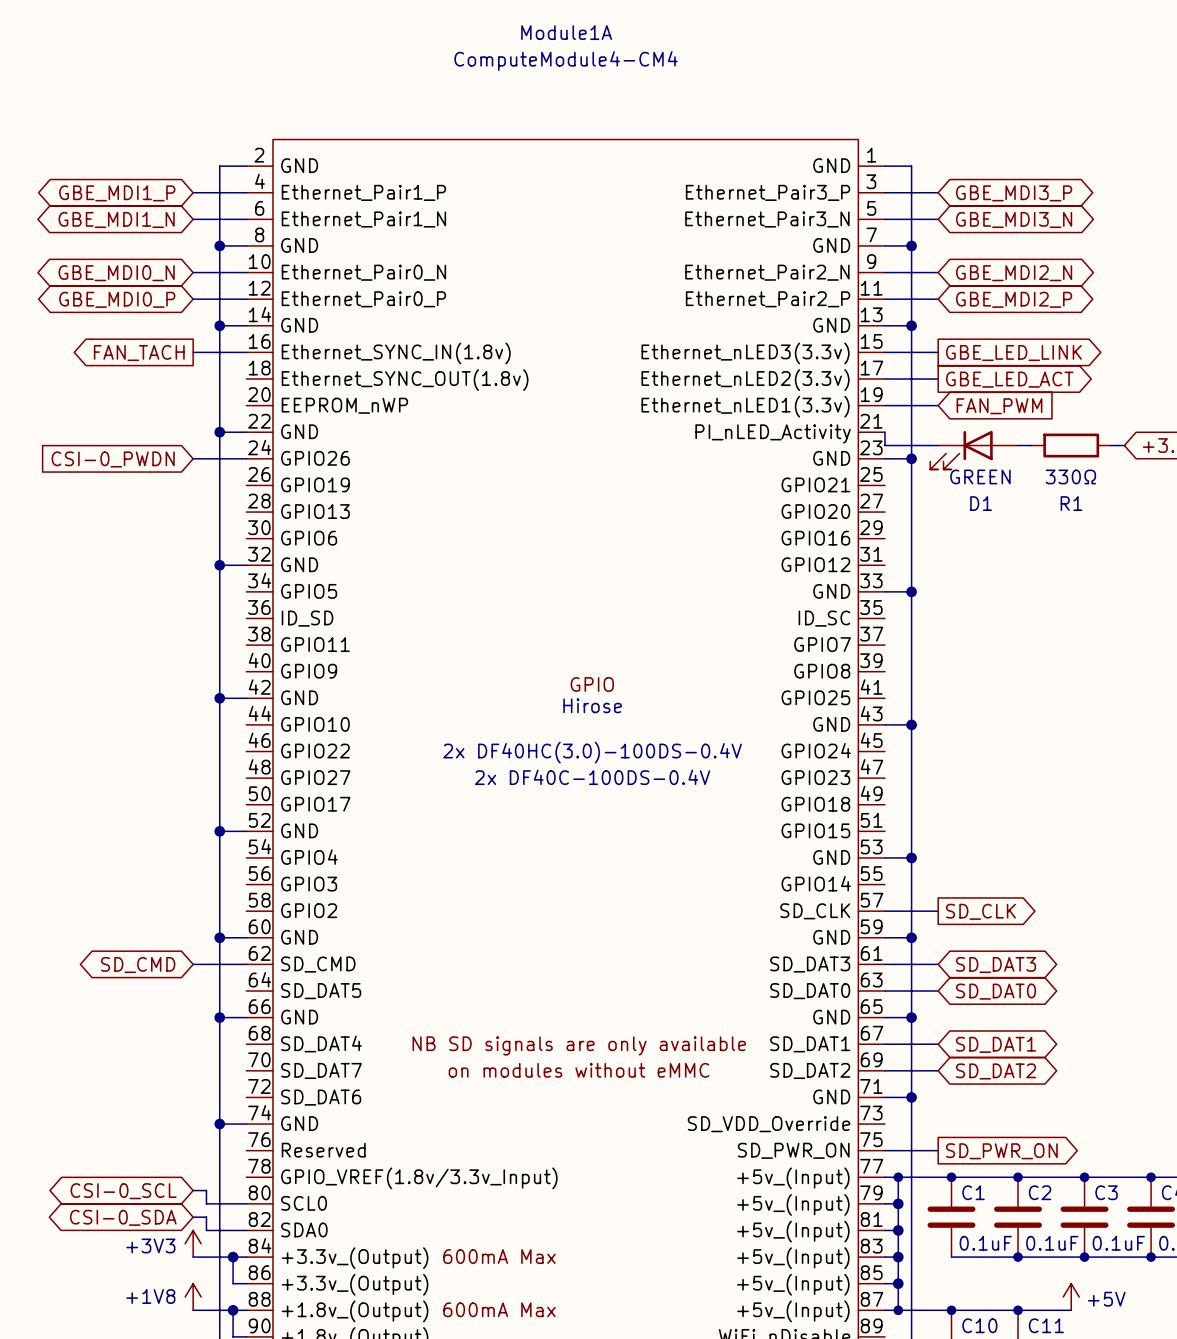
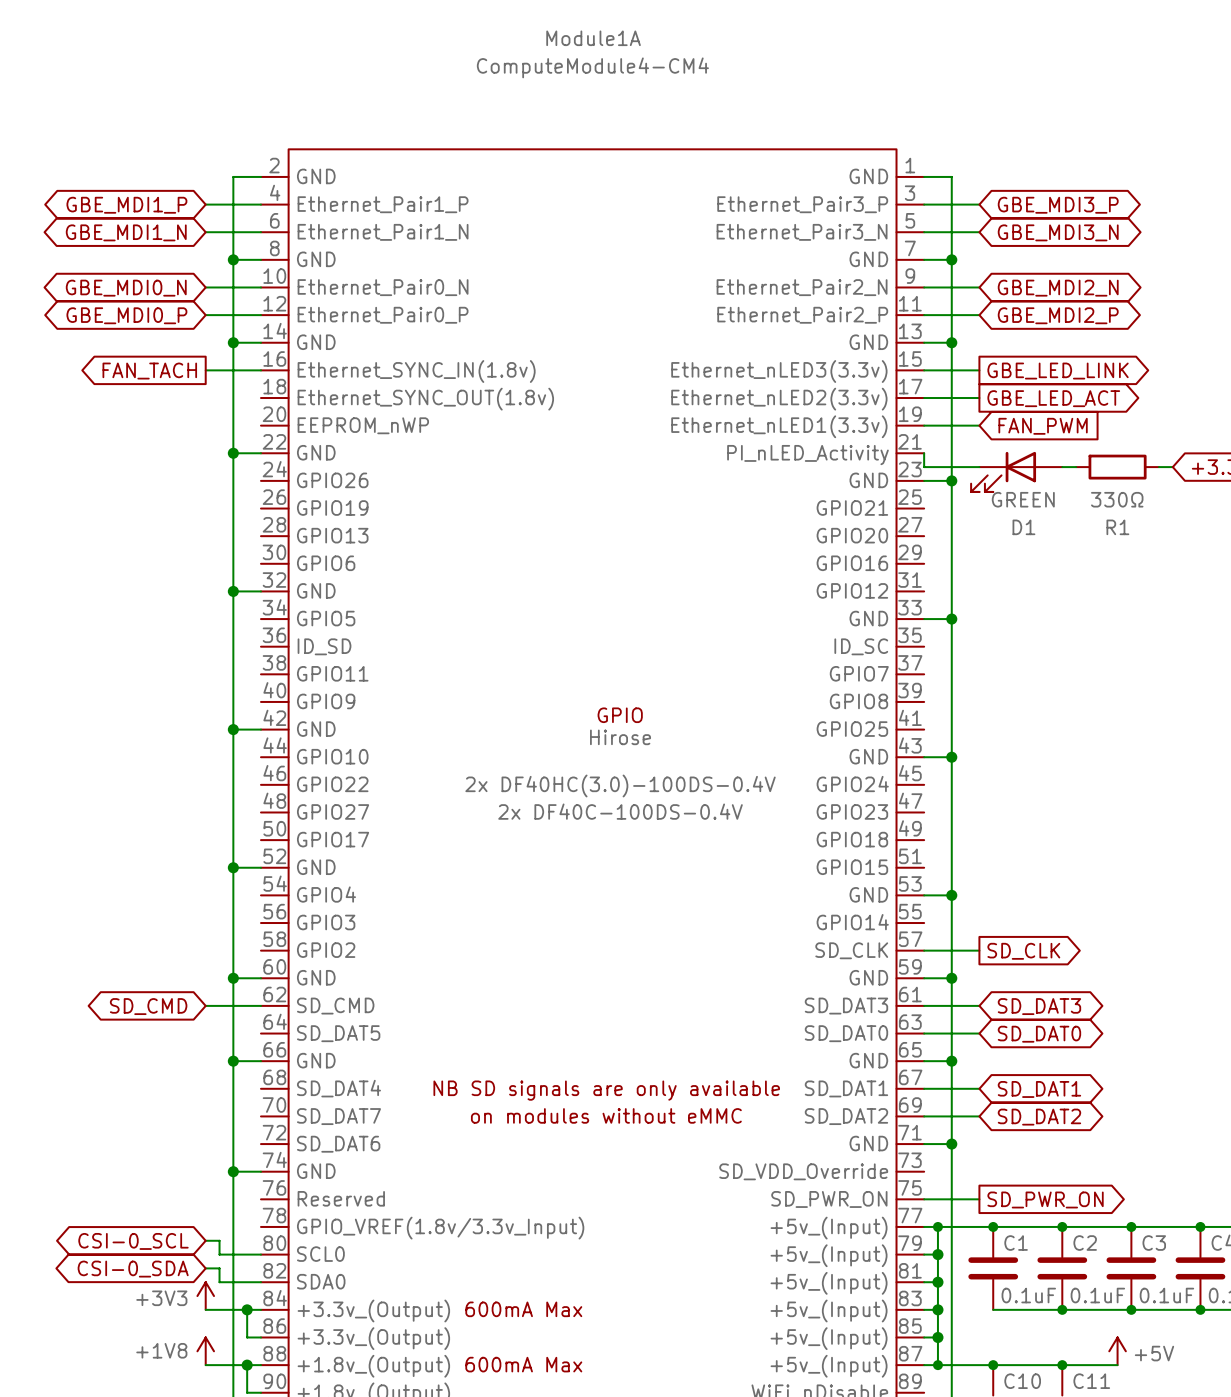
wire: (193, 458) (246, 458) -> none
global label: CSI-0_PWDN (113, 459) -> none

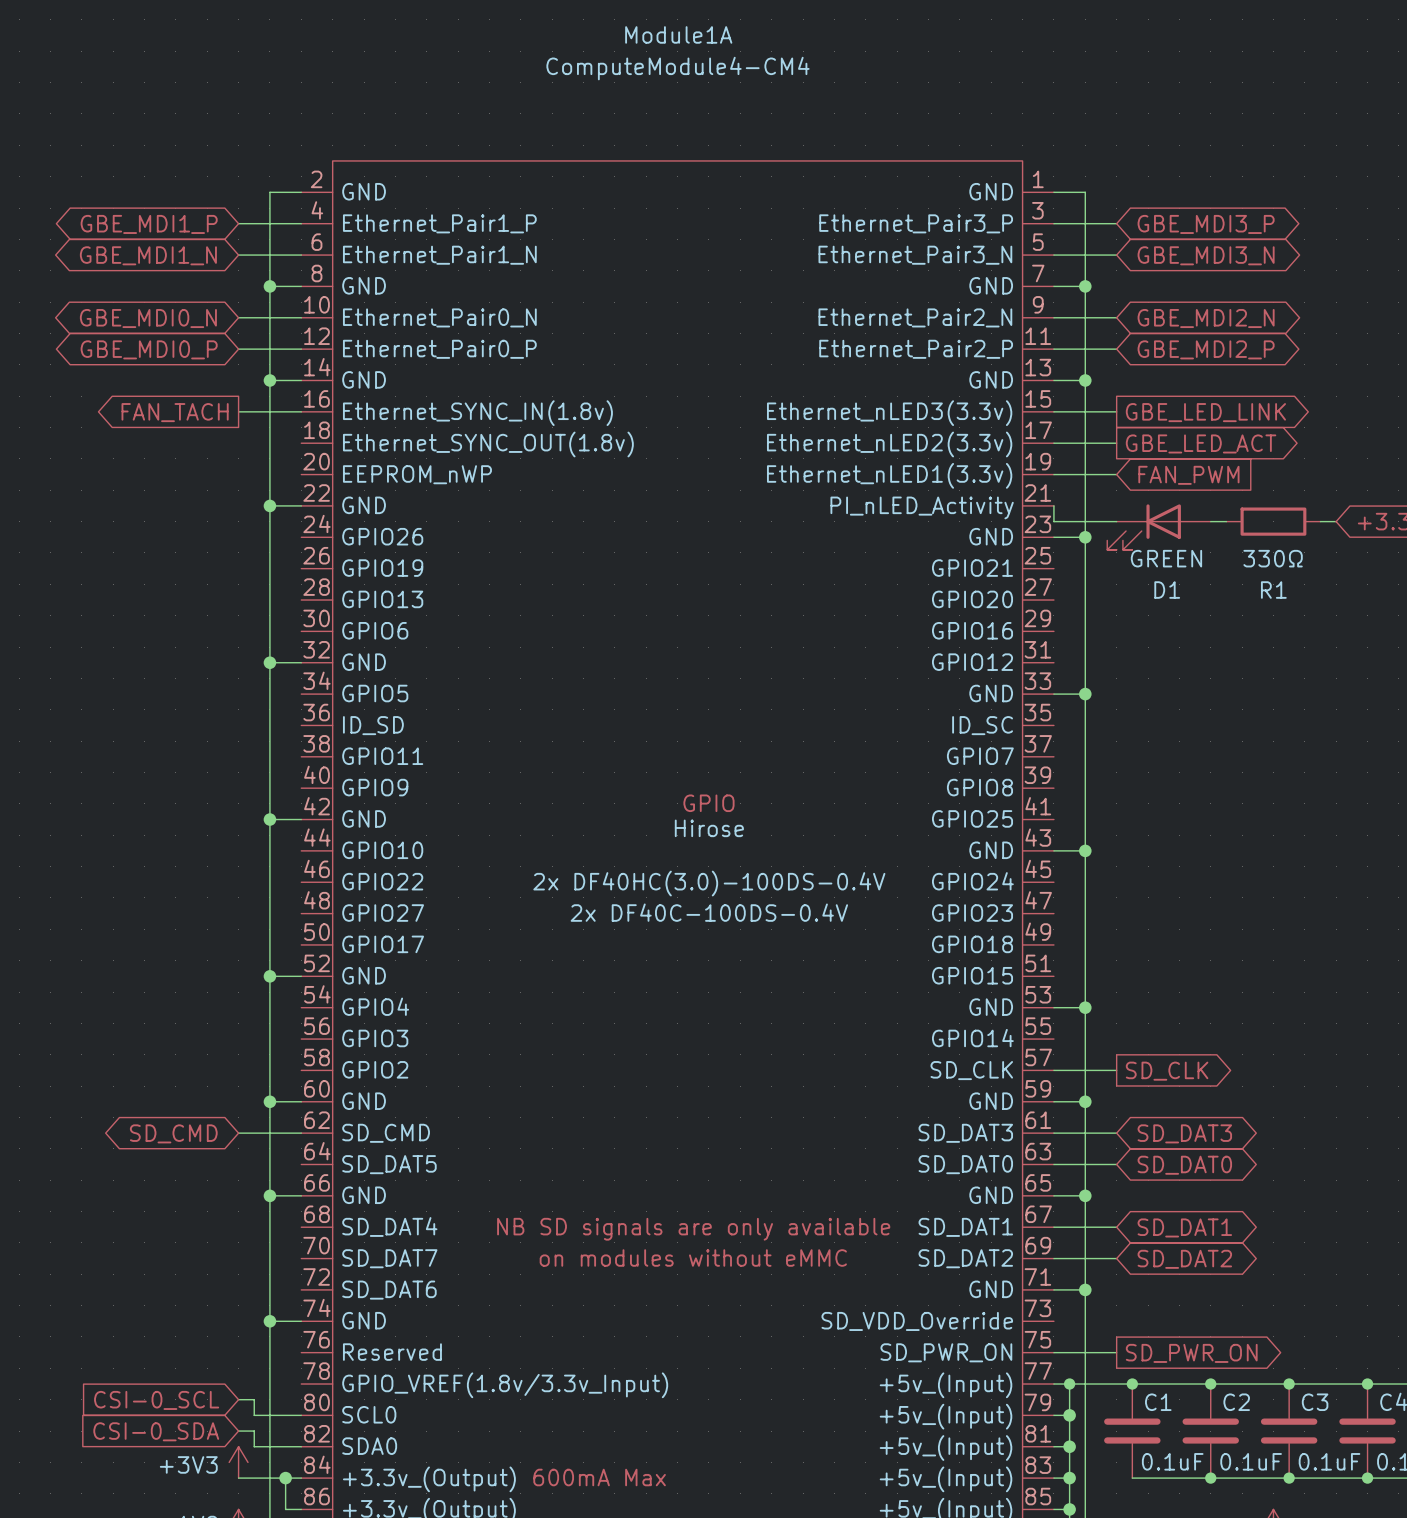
global label shape: bidirectional (133, 1241) -> input (156, 1400)
global label shape: bidirectional (133, 1269) -> input (156, 1431)

